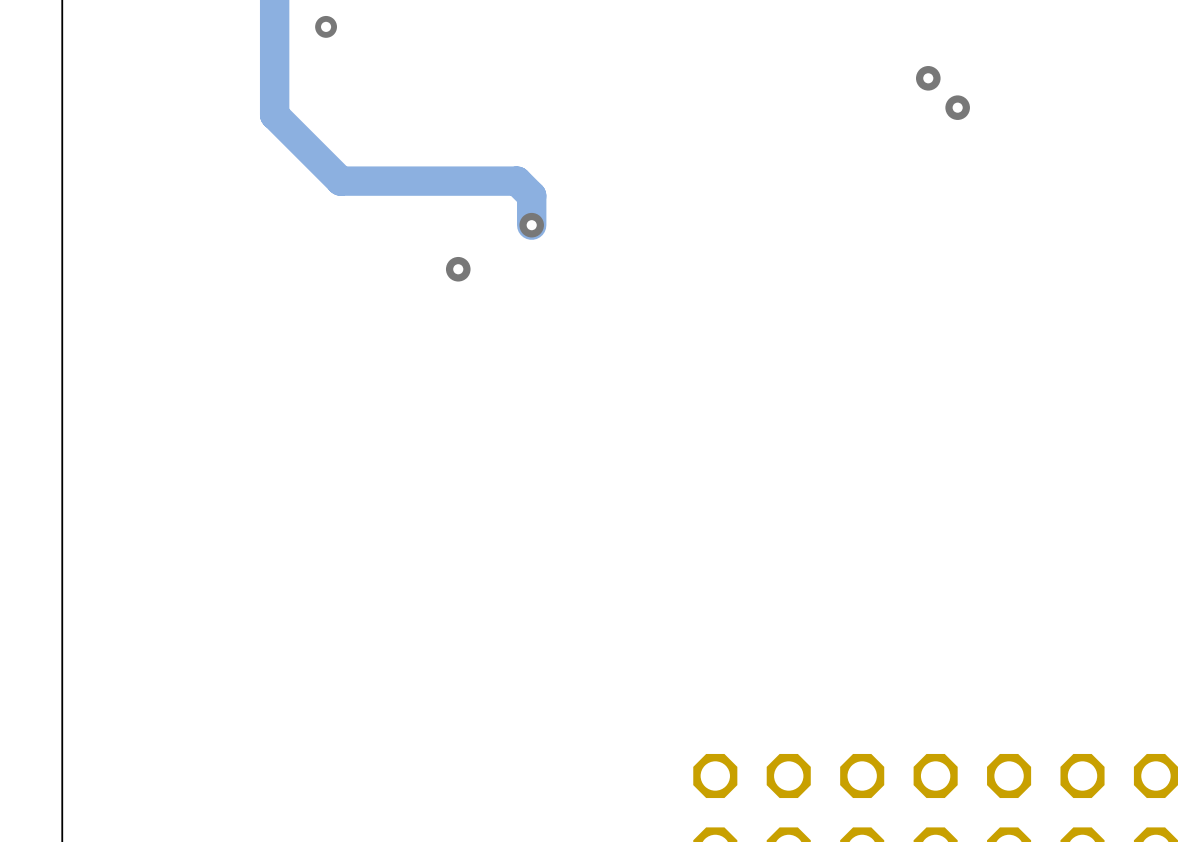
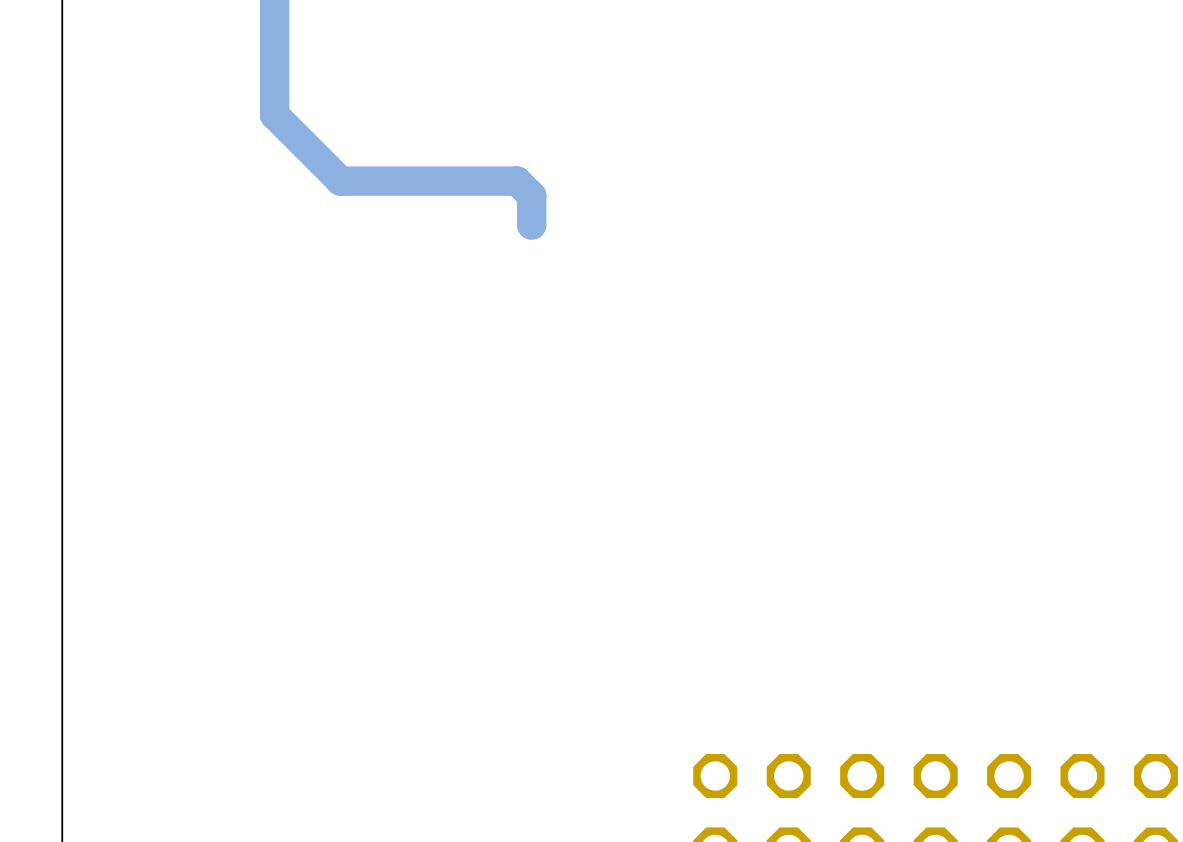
via: (326, 26) -> none
via: (928, 78) -> none
via: (957, 107) -> none
via: (531, 225) -> none
via: (458, 269) -> none

